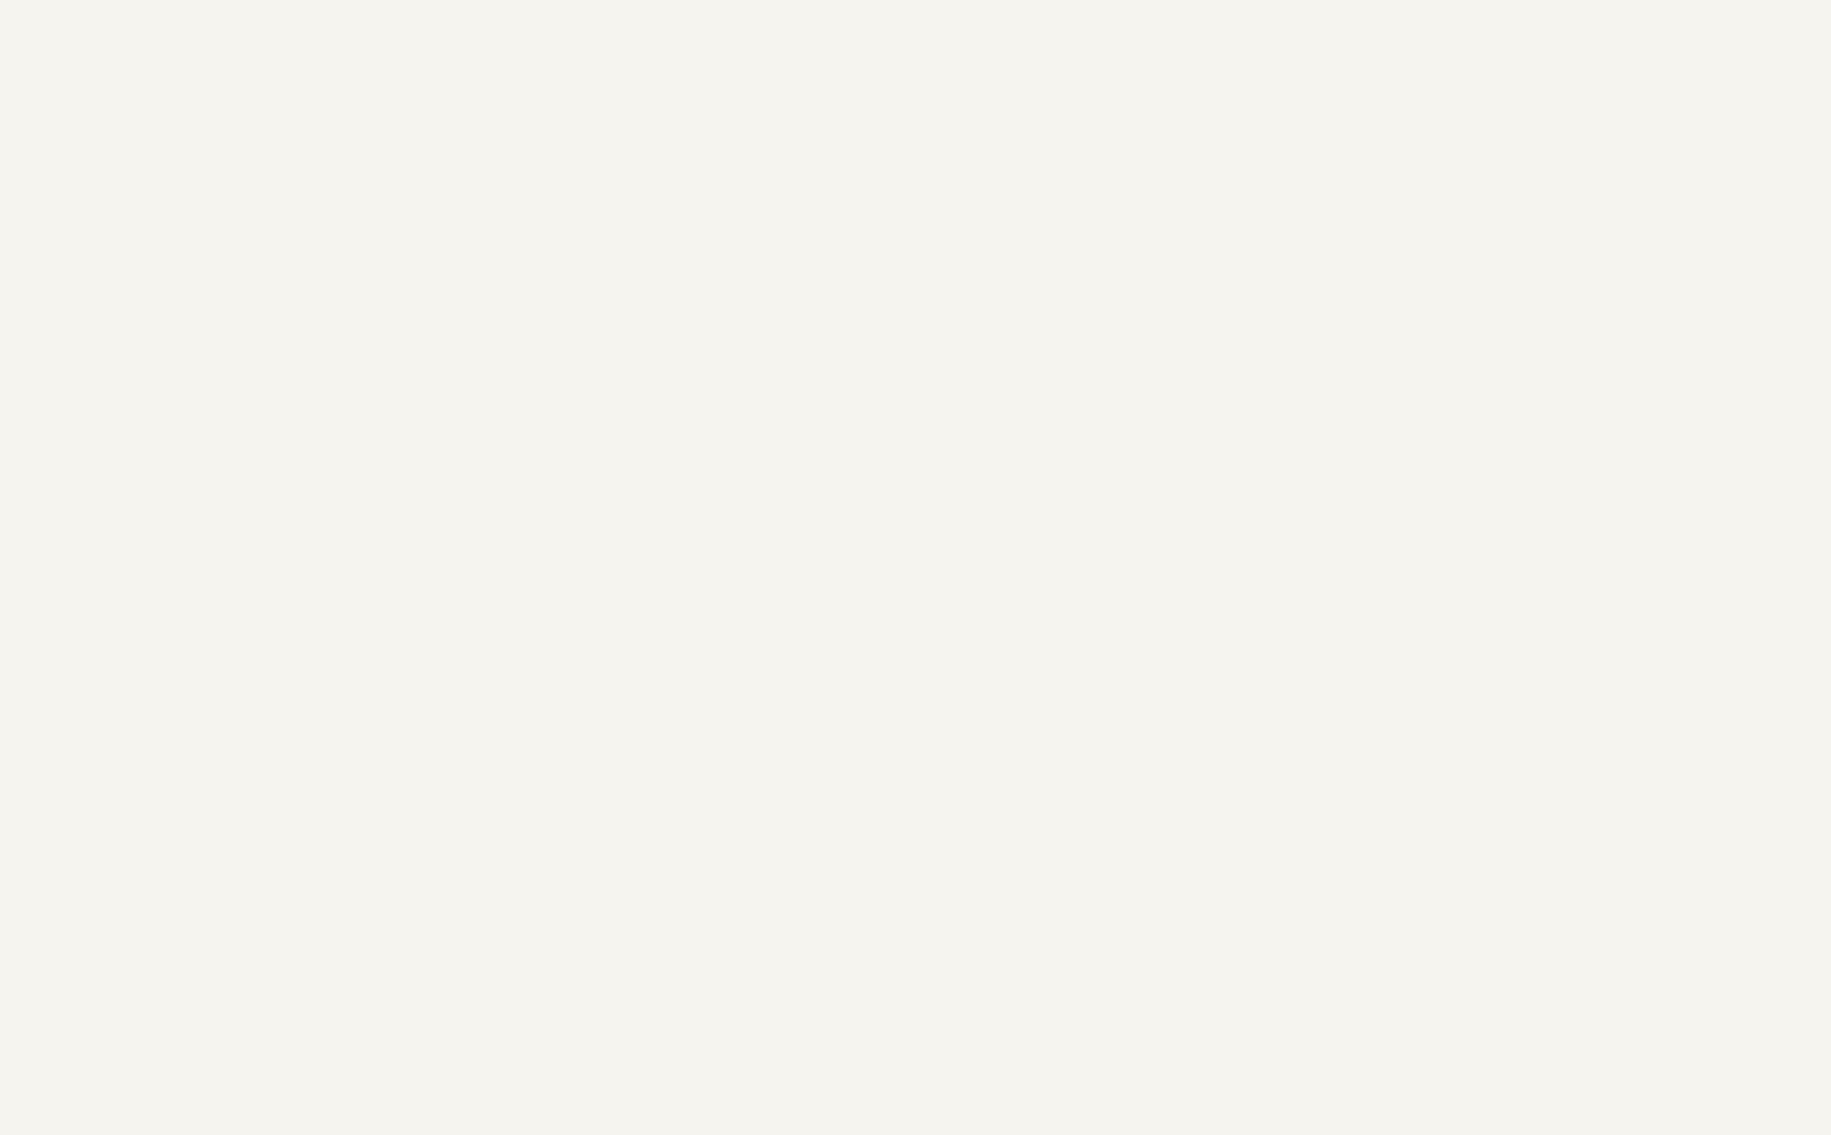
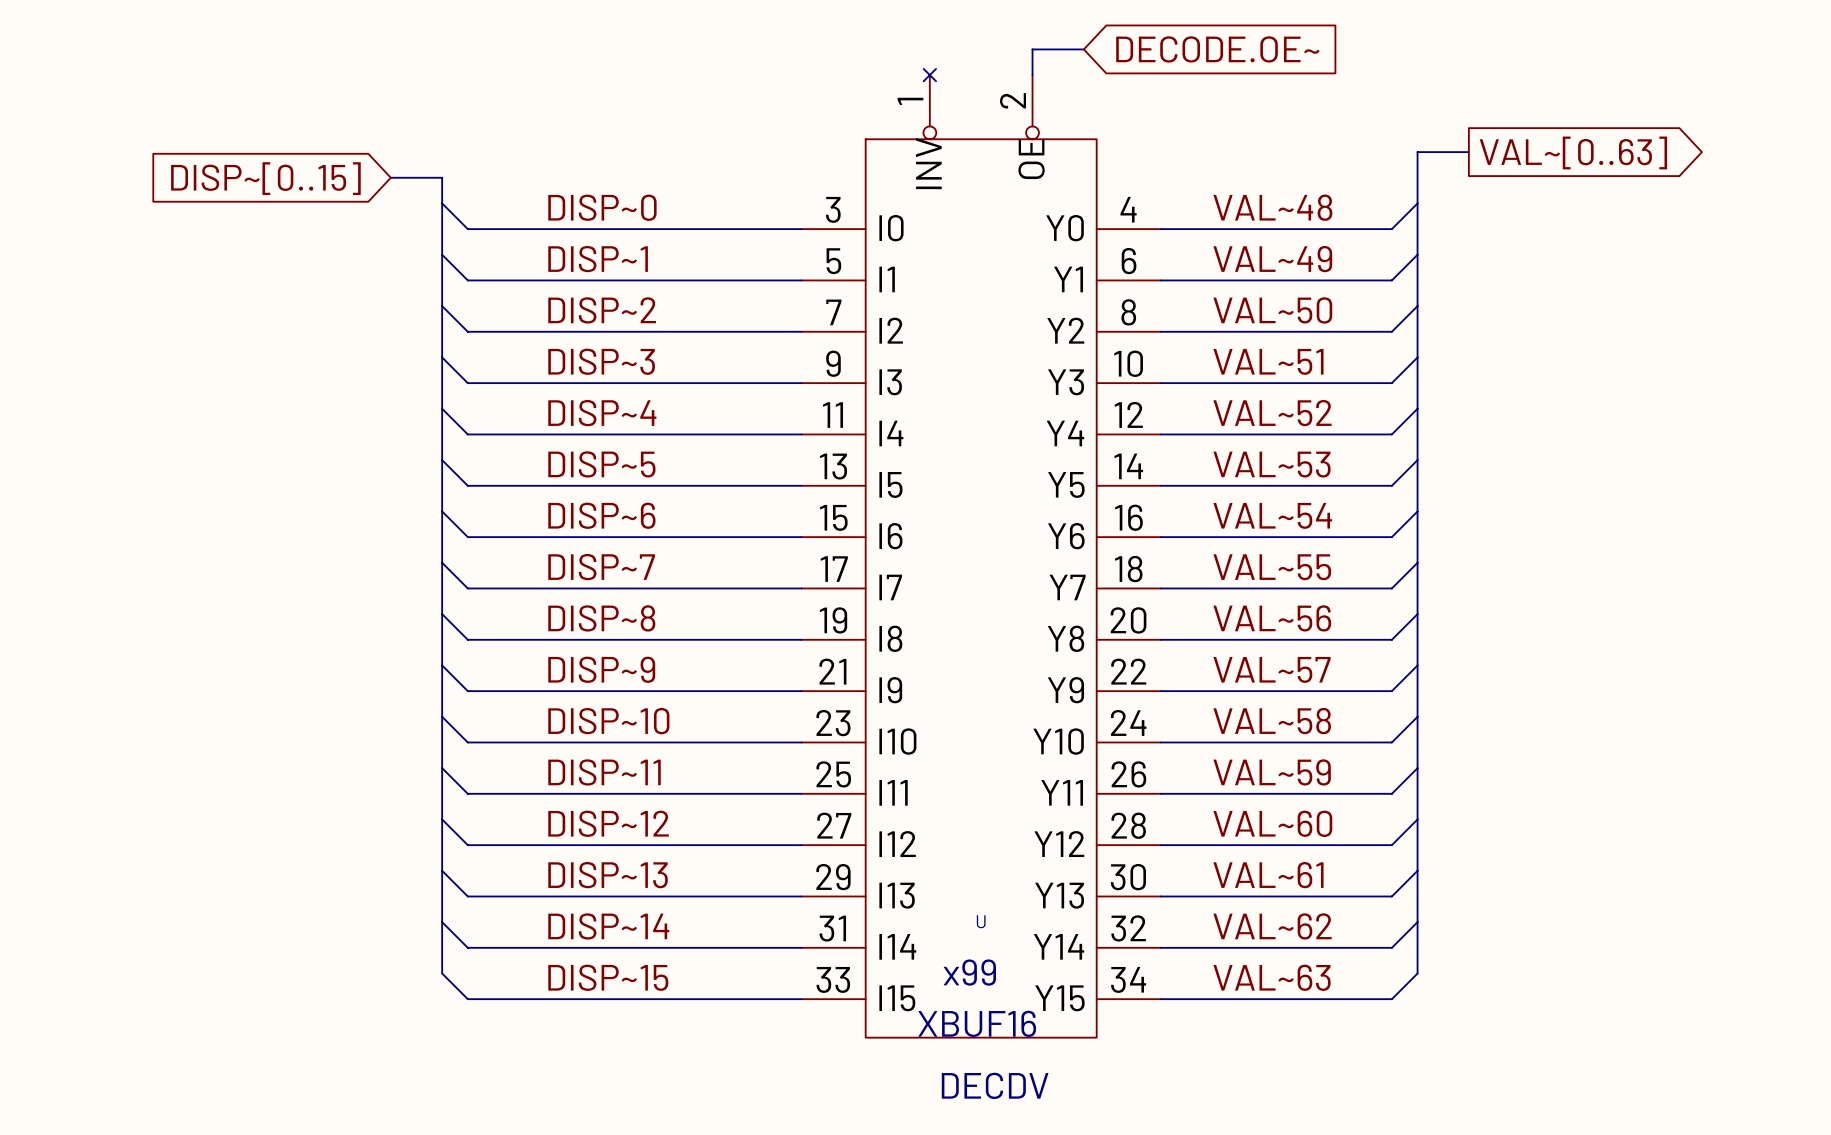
wire: none -> (1083, 49) (1032, 49) (1032, 75)
global label: none -> DECODE.OE~ (1217, 49)
no-connect mark: none -> (929, 75)
bus: none -> (1468, 152) (1417, 152) (1417, 973)
global label: none -> VAL~[0..63] (1573, 152)
bus: none -> (390, 177) (442, 177) (442, 973)
global label: none -> DISP~[0..15] (265, 178)
wire: none -> (442, 203) (467, 229) (801, 229)
wire: none -> (1417, 203) (1391, 229) (1160, 229)
label: none -> DISP~0 (602, 207)
label: none -> VAL~48 (1272, 207)
wire: none -> (442, 254) (467, 280) (801, 280)
wire: none -> (1417, 254) (1391, 280) (1160, 280)
label: none -> VAL~49 (1272, 259)
label: none -> DISP~1 (598, 259)
wire: none -> (442, 306) (467, 331) (801, 331)
wire: none -> (1417, 306) (1391, 331) (1160, 331)
label: none -> DISP~2 (602, 310)
label: none -> VAL~50 (1272, 310)
wire: none -> (442, 357) (467, 383) (801, 383)
wire: none -> (1417, 357) (1391, 383) (1160, 383)
label: none -> DISP~3 (601, 361)
label: none -> VAL~51 (1268, 361)
wire: none -> (442, 408) (467, 434) (801, 434)
wire: none -> (1417, 408) (1391, 434) (1160, 434)
label: none -> DISP~4 (602, 413)
label: none -> VAL~52 (1272, 413)
wire: none -> (442, 460) (467, 485) (801, 485)
wire: none -> (1417, 460) (1391, 485) (1160, 485)
label: none -> DISP~5 (601, 464)
label: none -> VAL~53 (1272, 464)
wire: none -> (442, 511) (467, 537) (801, 537)
wire: none -> (1417, 511) (1391, 537) (1160, 537)
label: none -> DISP~6 (601, 515)
label: none -> VAL~54 (1272, 515)
U: none -> XBUF16 (981, 556)
wire: none -> (442, 562) (467, 588) (801, 588)
wire: none -> (1417, 562) (1391, 588) (1160, 588)
label: none -> DISP~7 (601, 567)
label: none -> VAL~55 (1272, 567)
wire: none -> (442, 614) (467, 639) (801, 639)
wire: none -> (1417, 614) (1391, 639) (1160, 639)
label: none -> DISP~8 (601, 618)
label: none -> VAL~56 (1272, 618)
wire: none -> (442, 665) (467, 691) (801, 691)
wire: none -> (1417, 665) (1391, 691) (1160, 691)
label: none -> DISP~9 (601, 669)
label: none -> VAL~57 (1272, 669)
wire: none -> (442, 716) (467, 742) (801, 742)
wire: none -> (1417, 716) (1391, 742) (1160, 742)
label: none -> DISP~10 (608, 721)
label: none -> VAL~58 (1272, 721)
wire: none -> (442, 768) (467, 793) (801, 793)
wire: none -> (1417, 768) (1391, 793) (1160, 793)
label: none -> DISP~11 (604, 772)
label: none -> VAL~59 (1272, 772)
wire: none -> (442, 819) (467, 845) (801, 845)
wire: none -> (1417, 819) (1391, 845) (1160, 845)
label: none -> DISP~12 (608, 823)
label: none -> VAL~60 (1272, 823)
wire: none -> (442, 870) (467, 896) (801, 896)
wire: none -> (1417, 870) (1391, 896) (1160, 896)
label: none -> DISP~13 (608, 875)
label: none -> VAL~61 (1268, 875)
wire: none -> (442, 922) (467, 947) (801, 947)
wire: none -> (1417, 922) (1391, 947) (1160, 947)
label: none -> DISP~14 (608, 926)
label: none -> VAL~62 (1272, 926)
wire: none -> (442, 973) (467, 999) (801, 999)
wire: none -> (1417, 973) (1391, 999) (1160, 999)
label: none -> DISP~15 (608, 977)
label: none -> VAL~63 (1272, 977)

